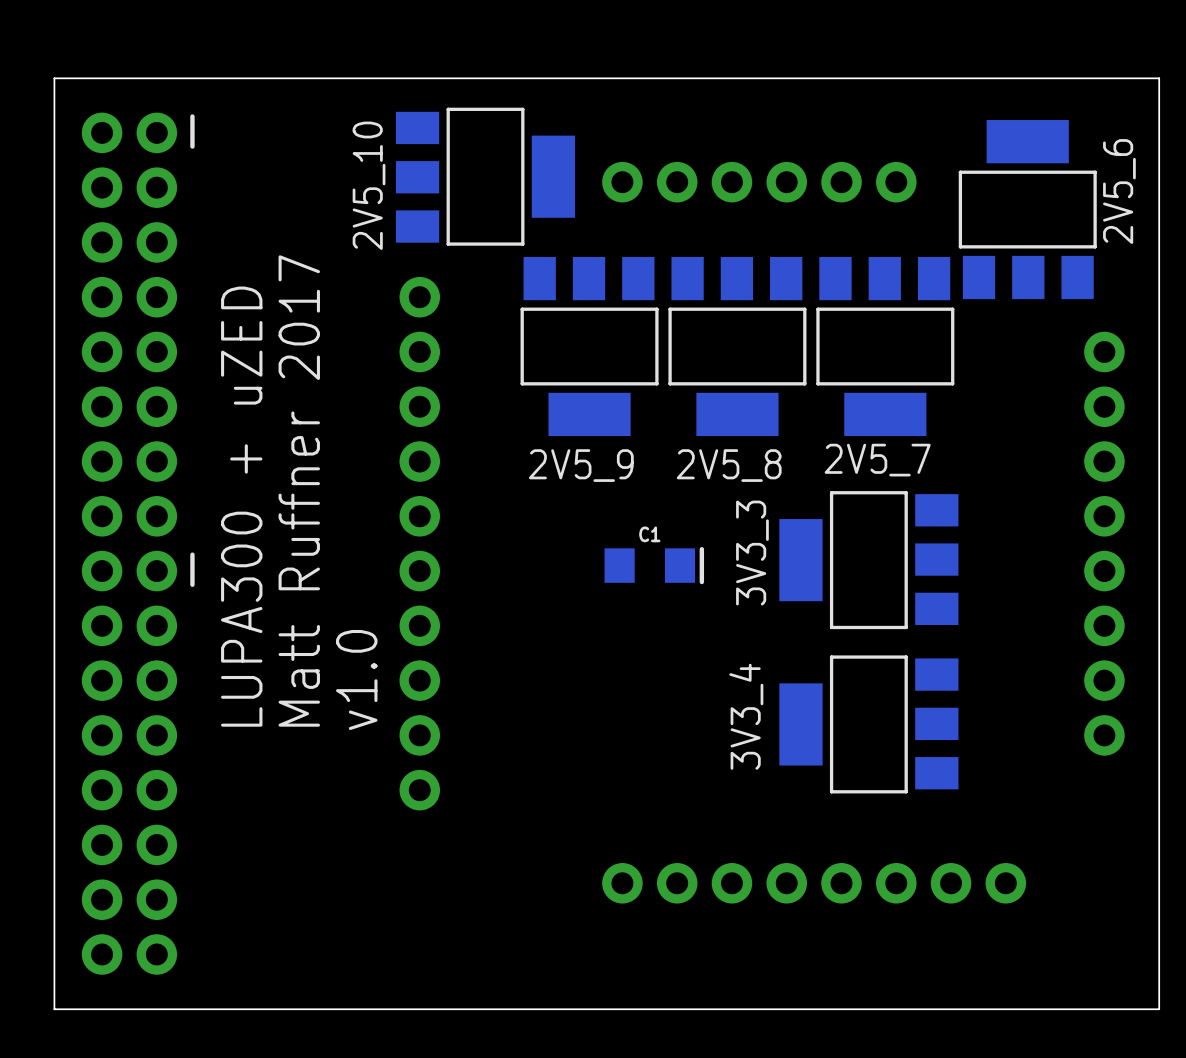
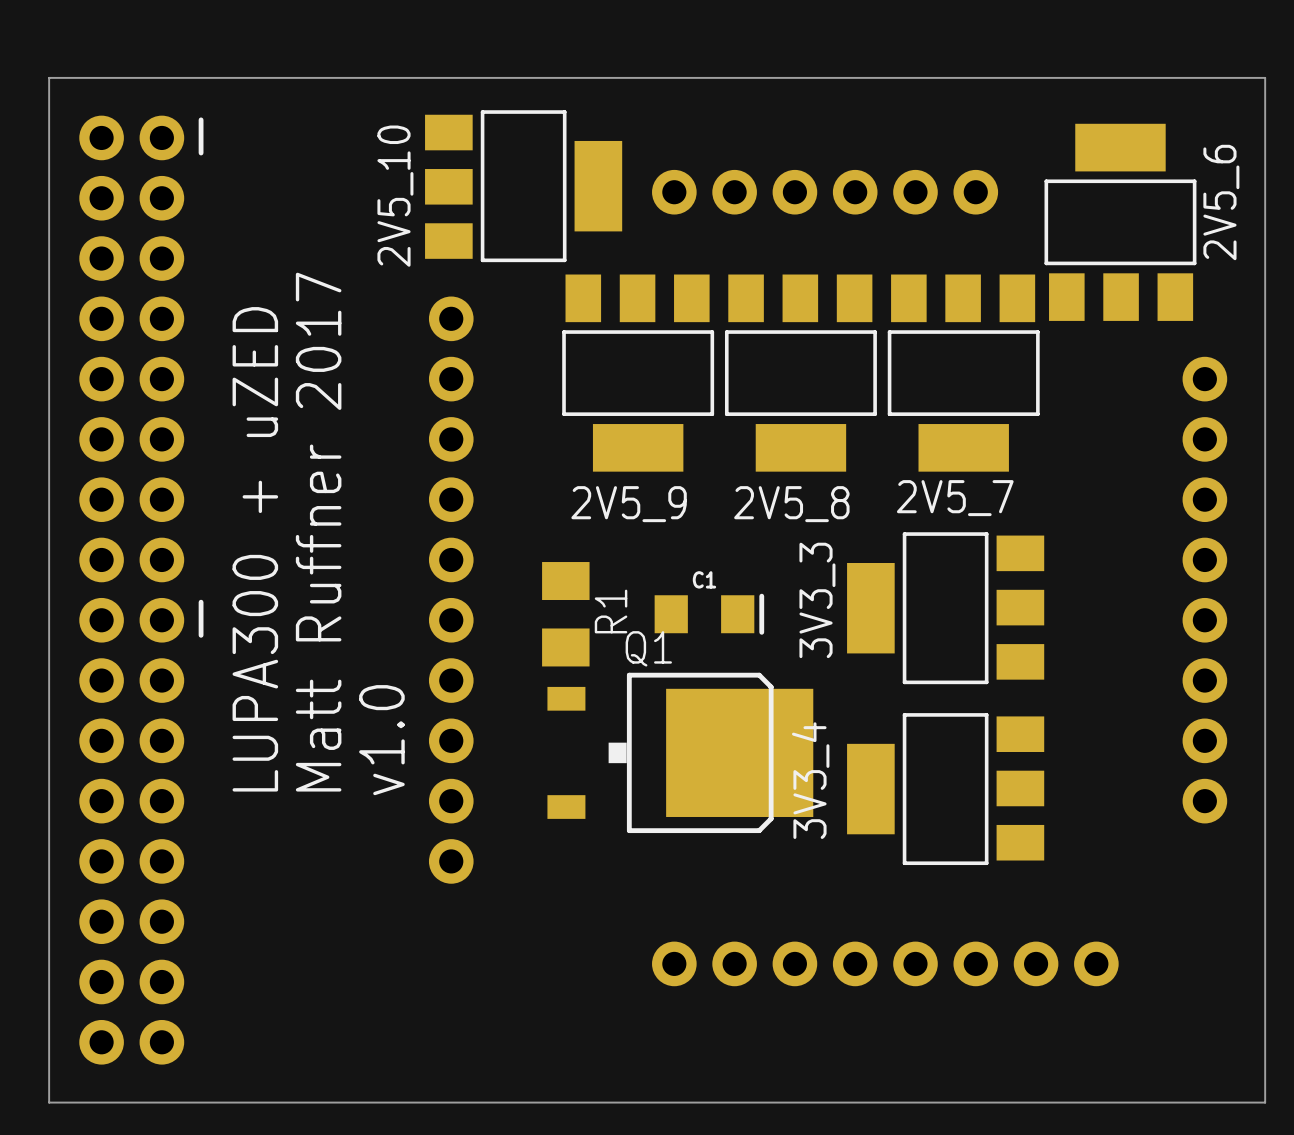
R1: none -> (565, 614)
Q1: none -> (680, 752)

